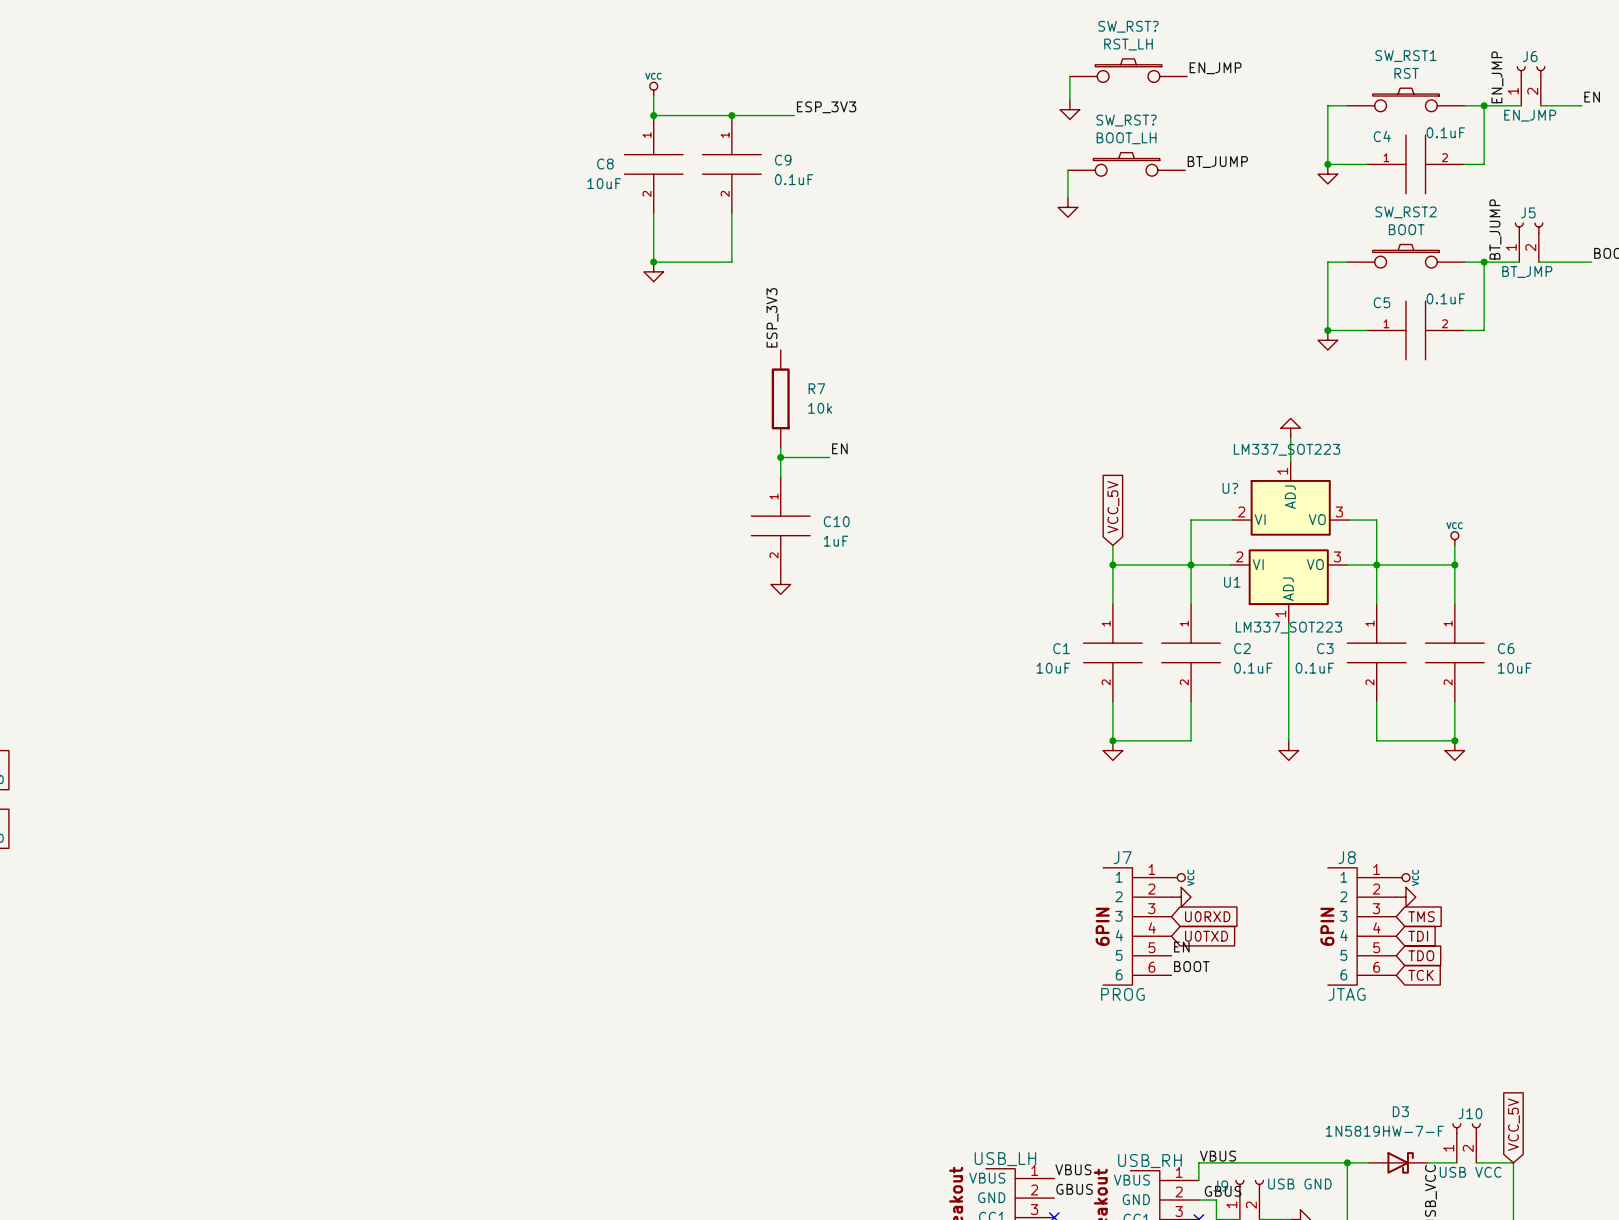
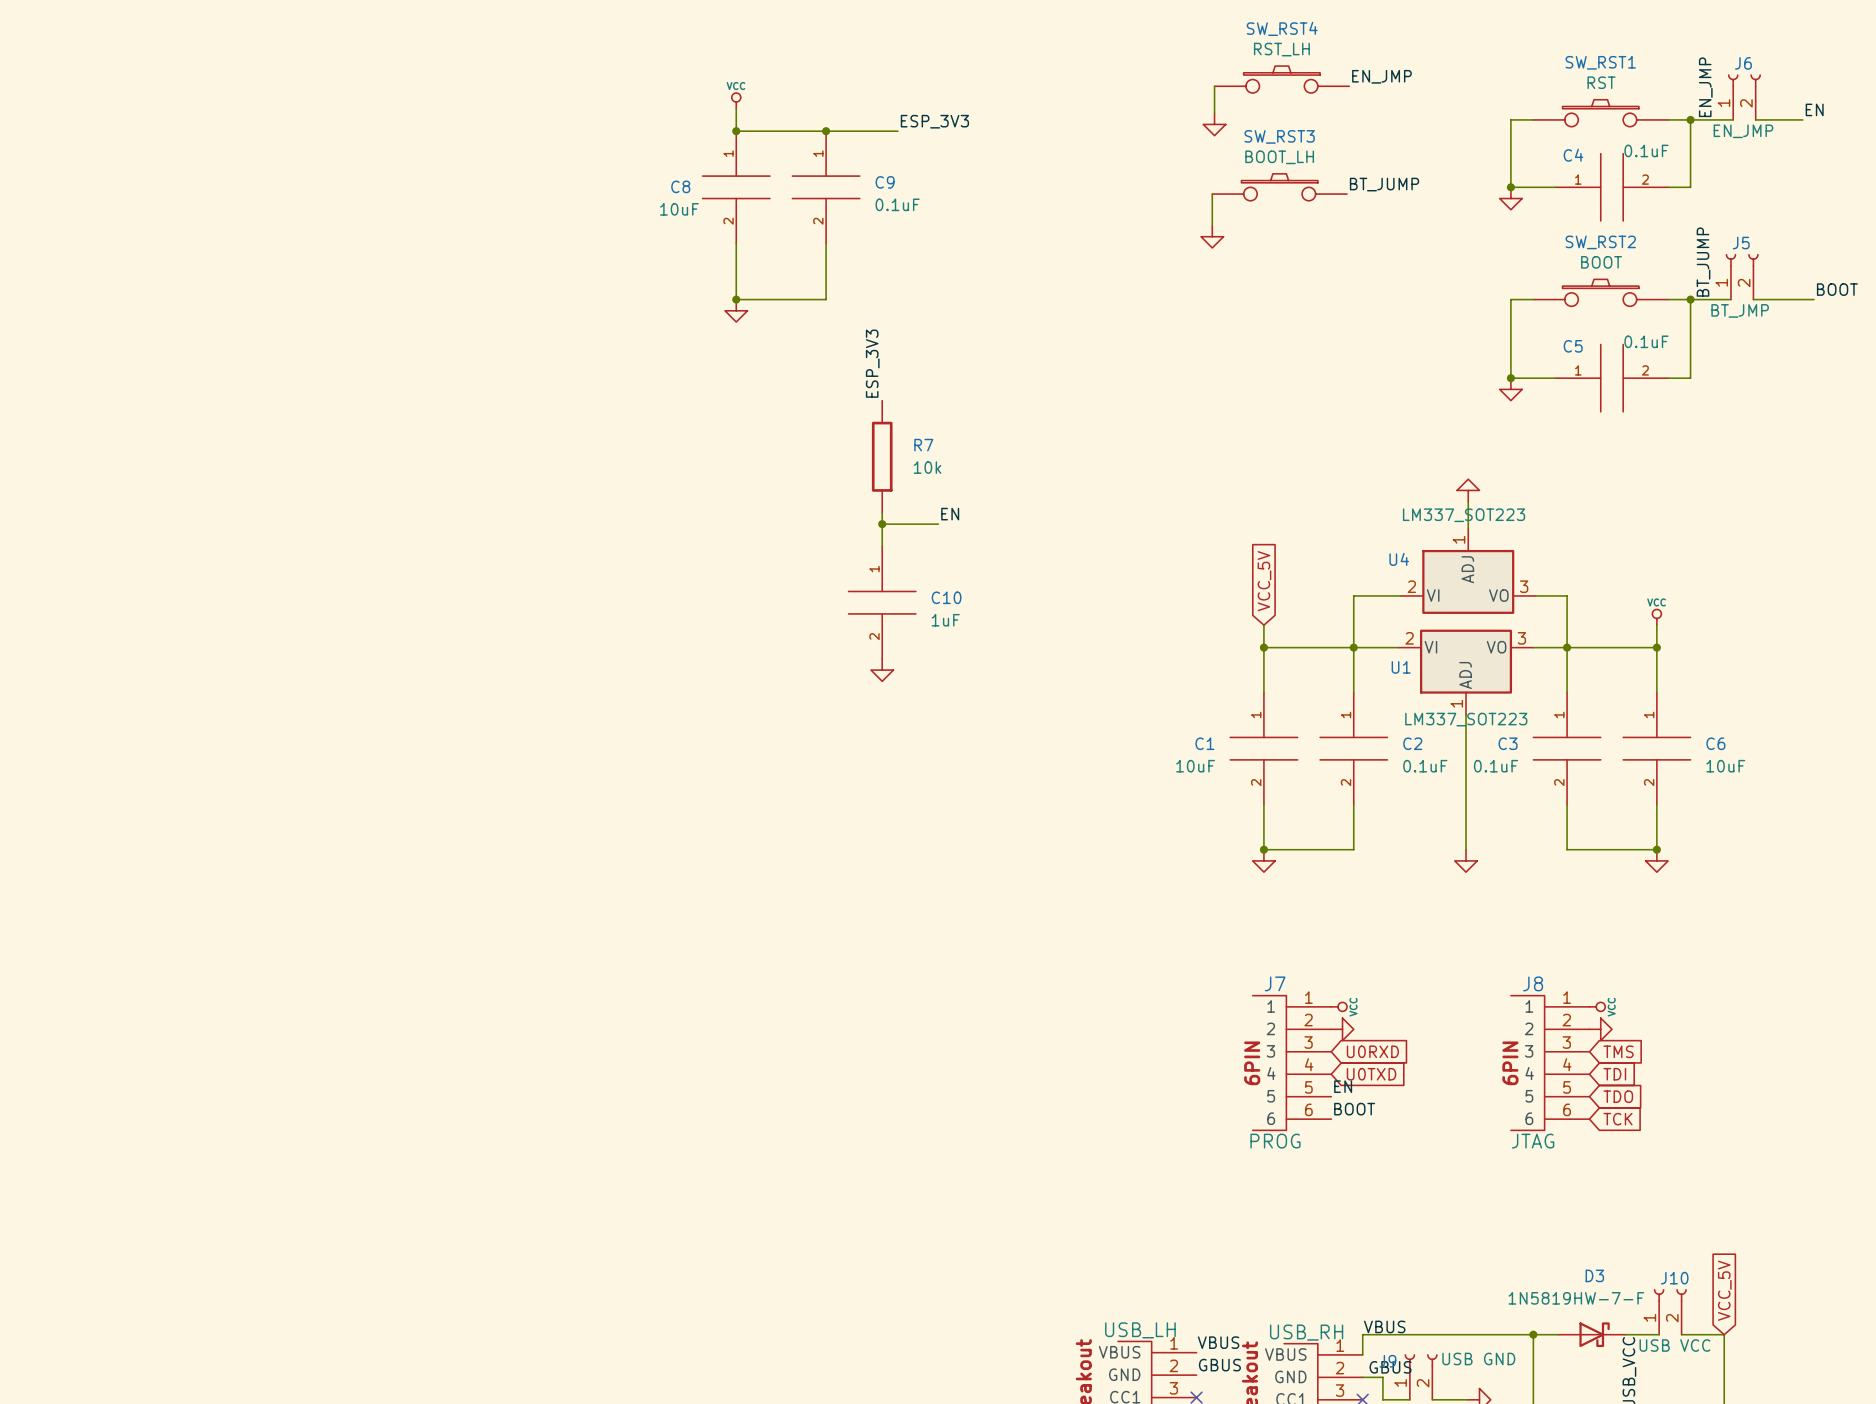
SW_RST? name: SW_RST? (1128, 26) -> SW_RST4 (1282, 28)
SW_RST? name: SW_RST? (1126, 120) -> SW_RST3 (1279, 136)
U? name: U? (1230, 488) -> U4 (1399, 559)

